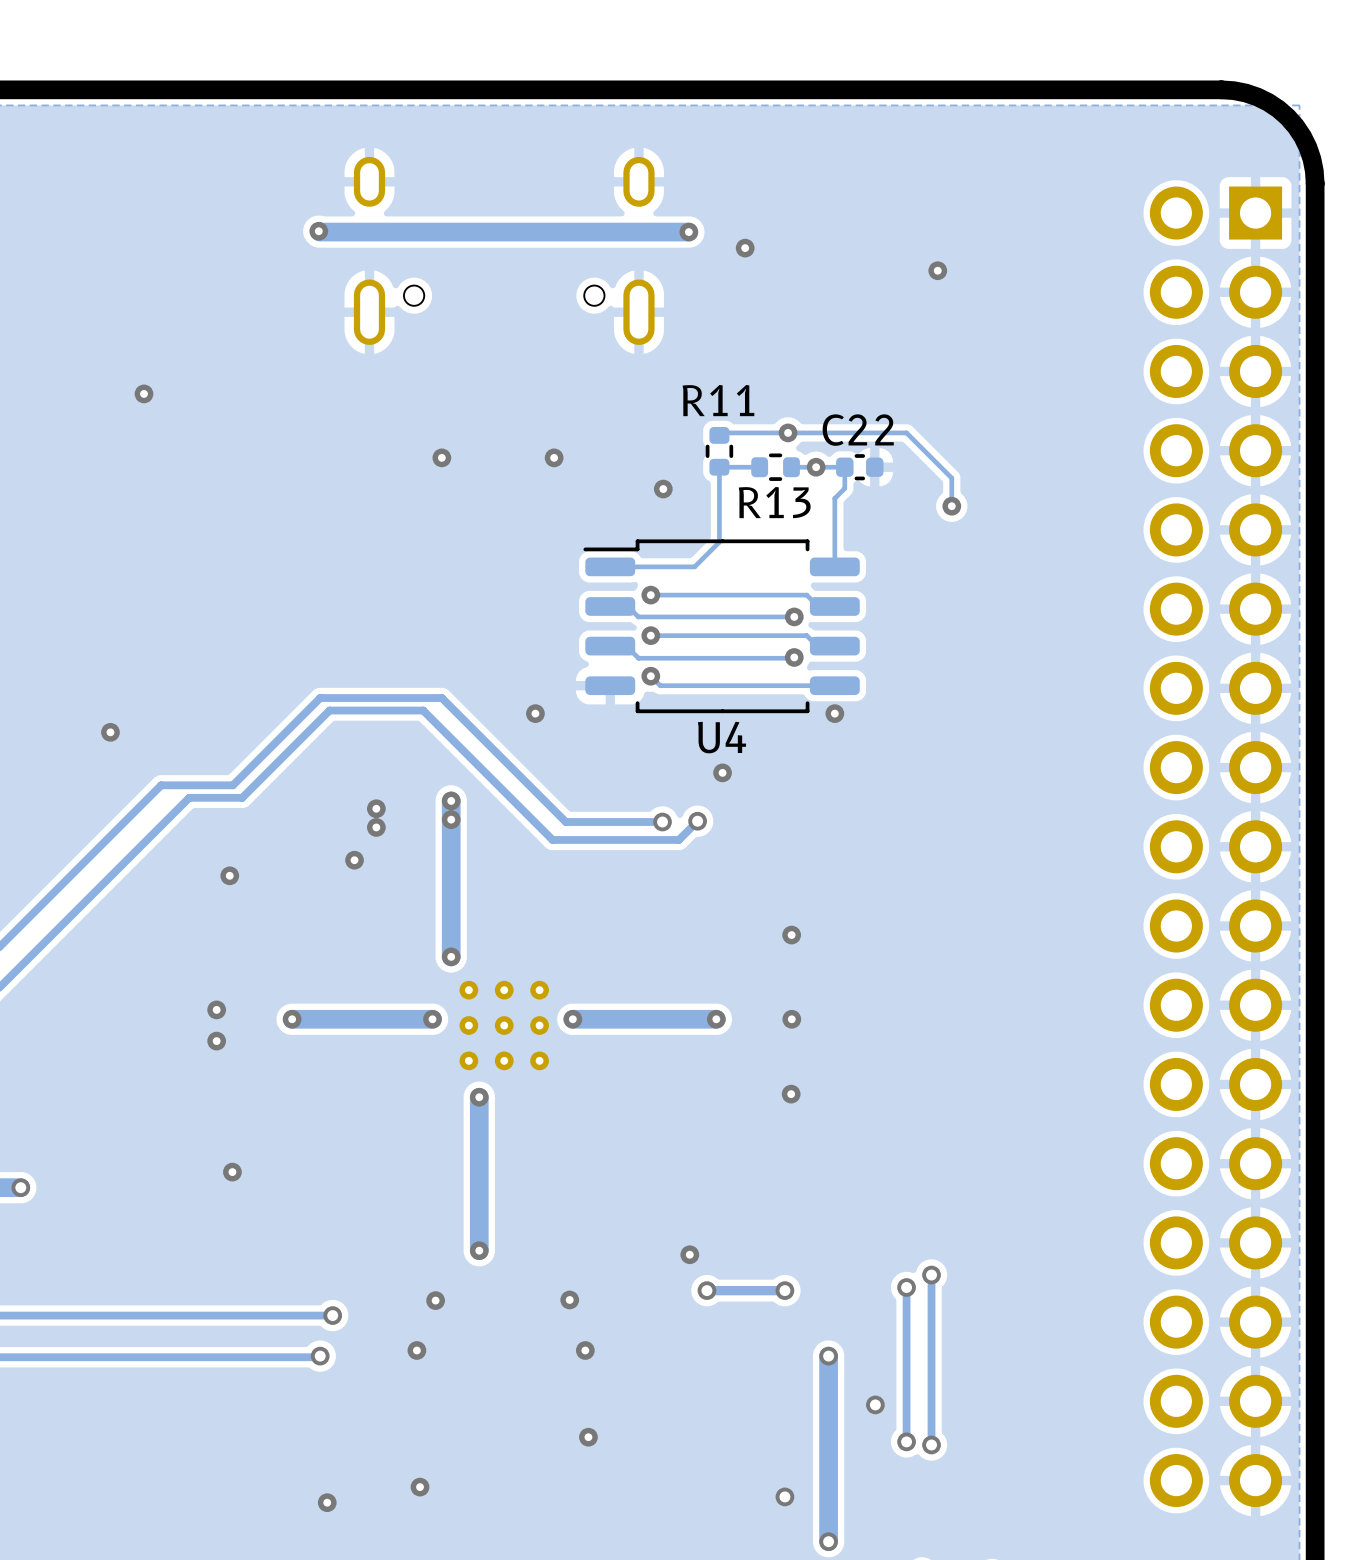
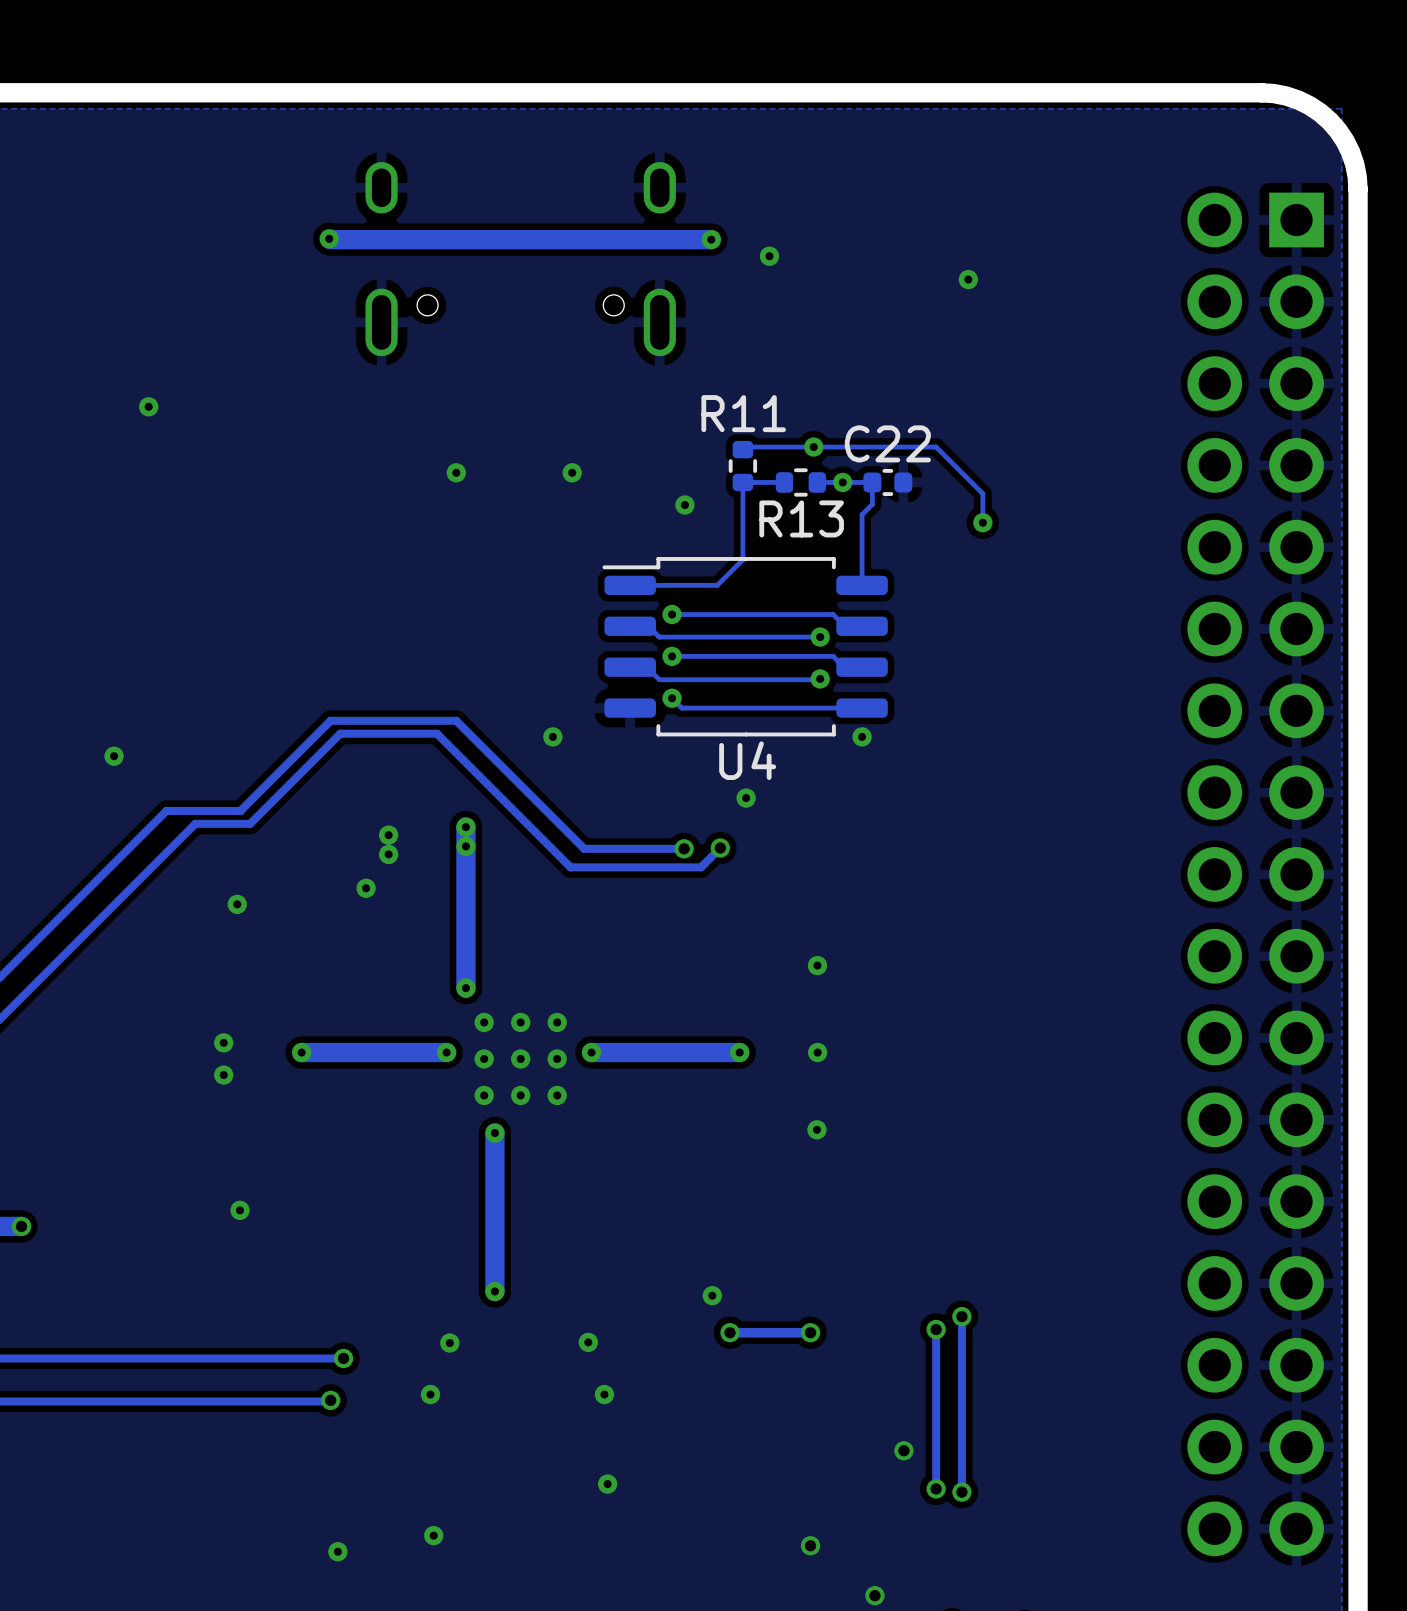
track: (828, 1356) (828, 1541) -> none
via: (828, 1356) -> none
via: (828, 1541) -> none
via: none -> (874, 1595)

